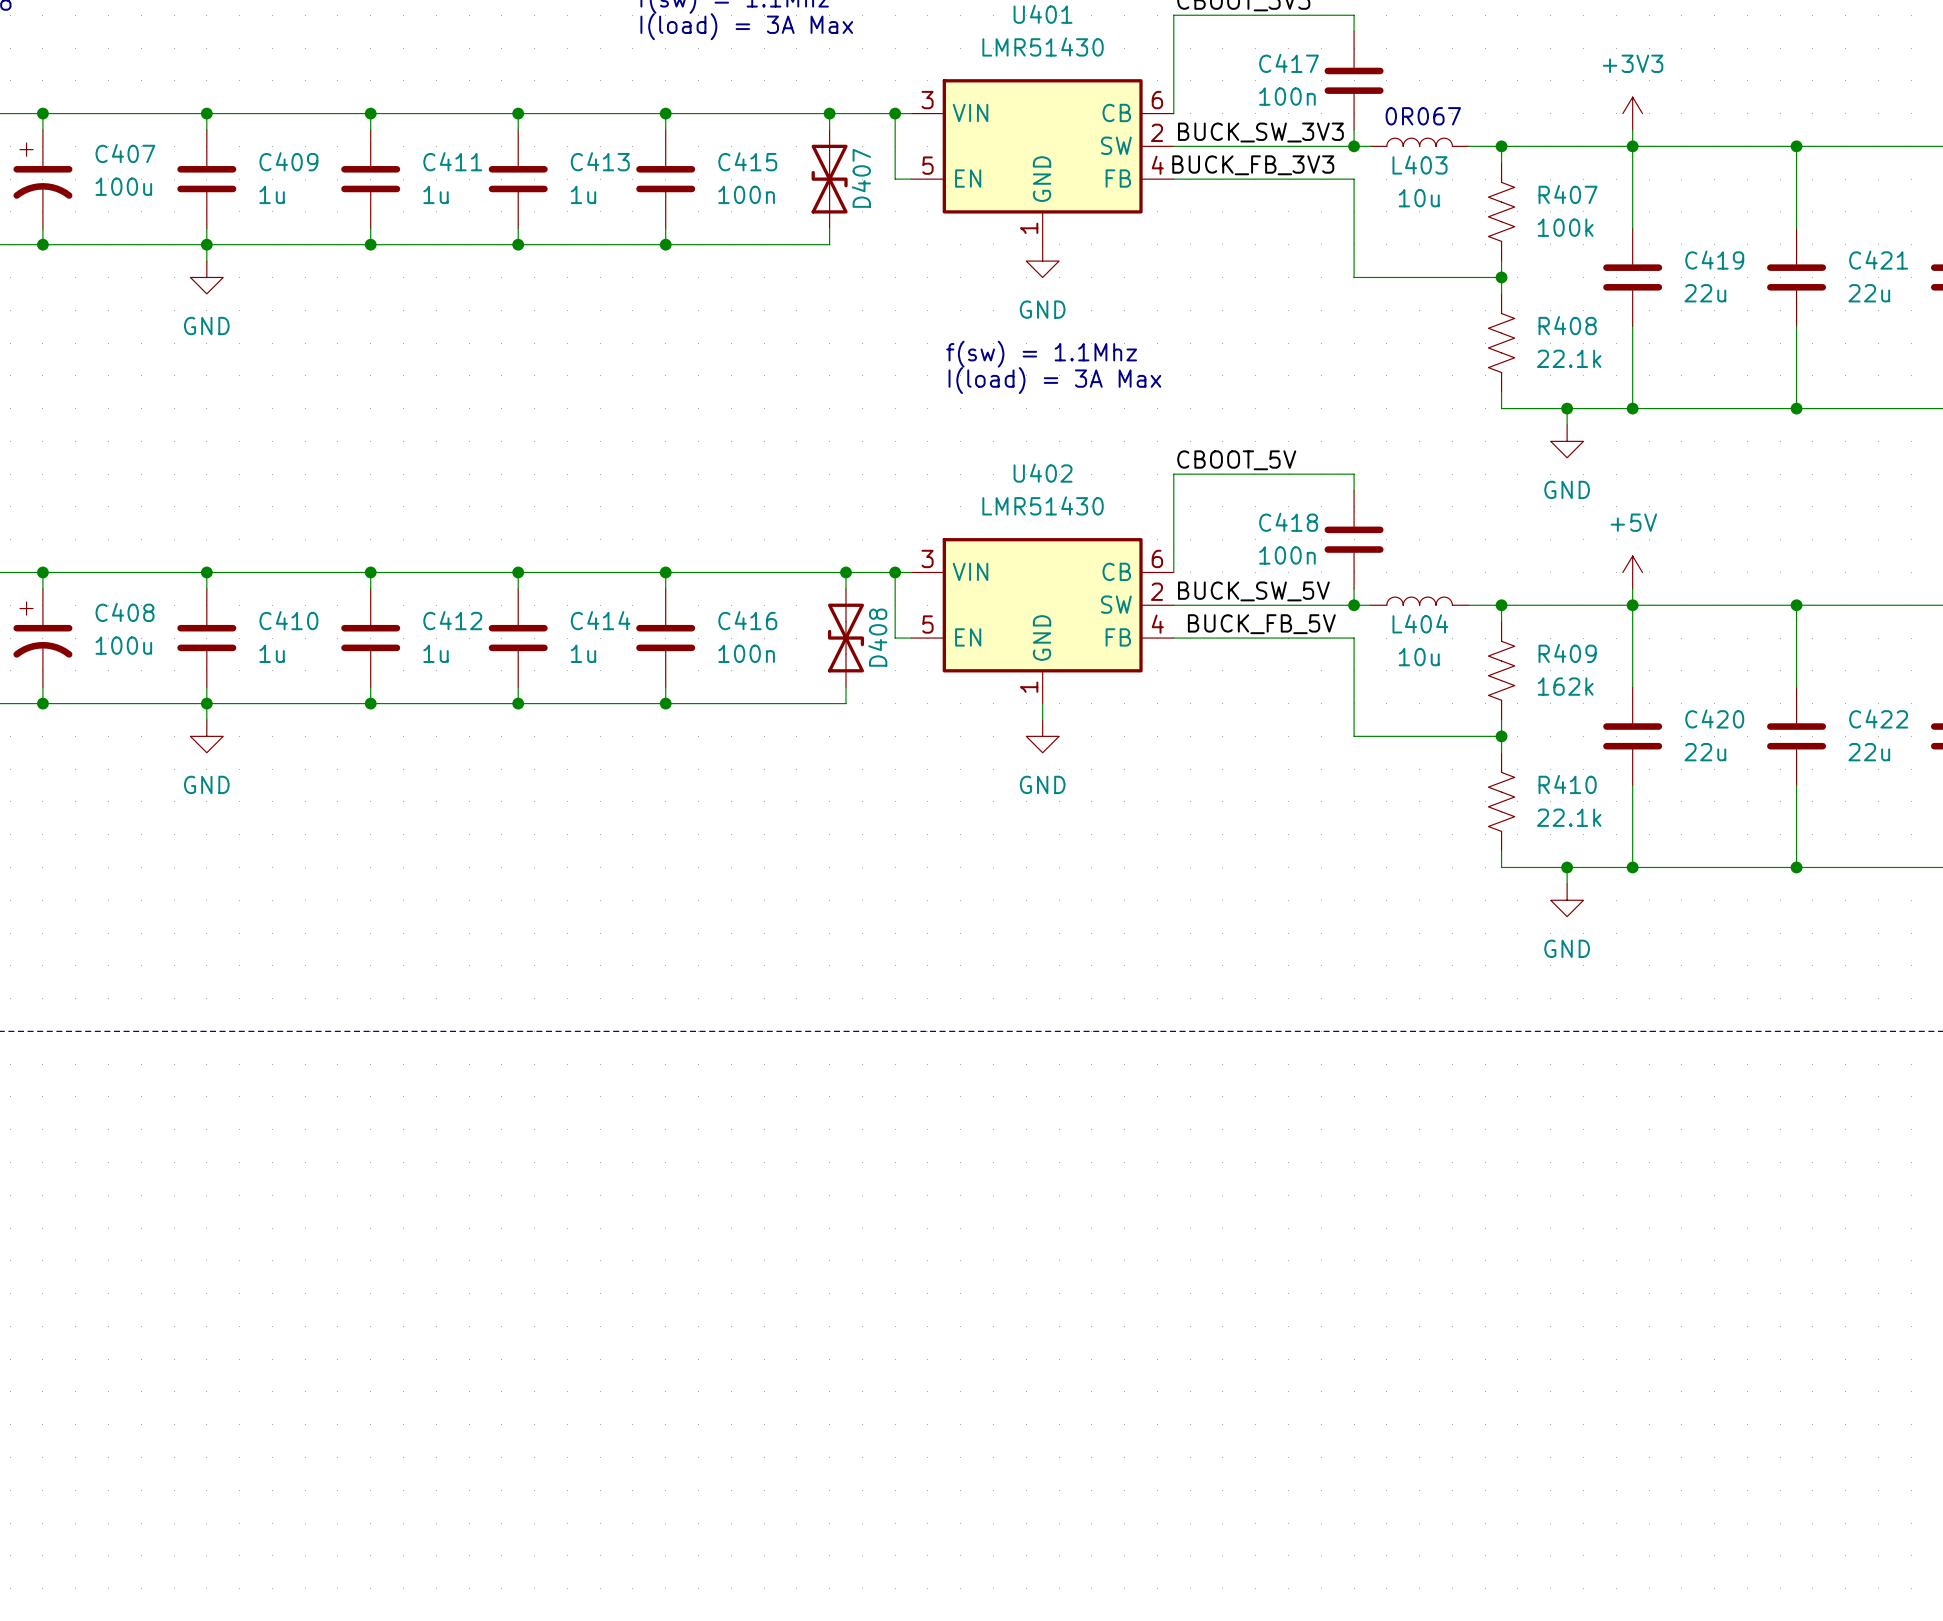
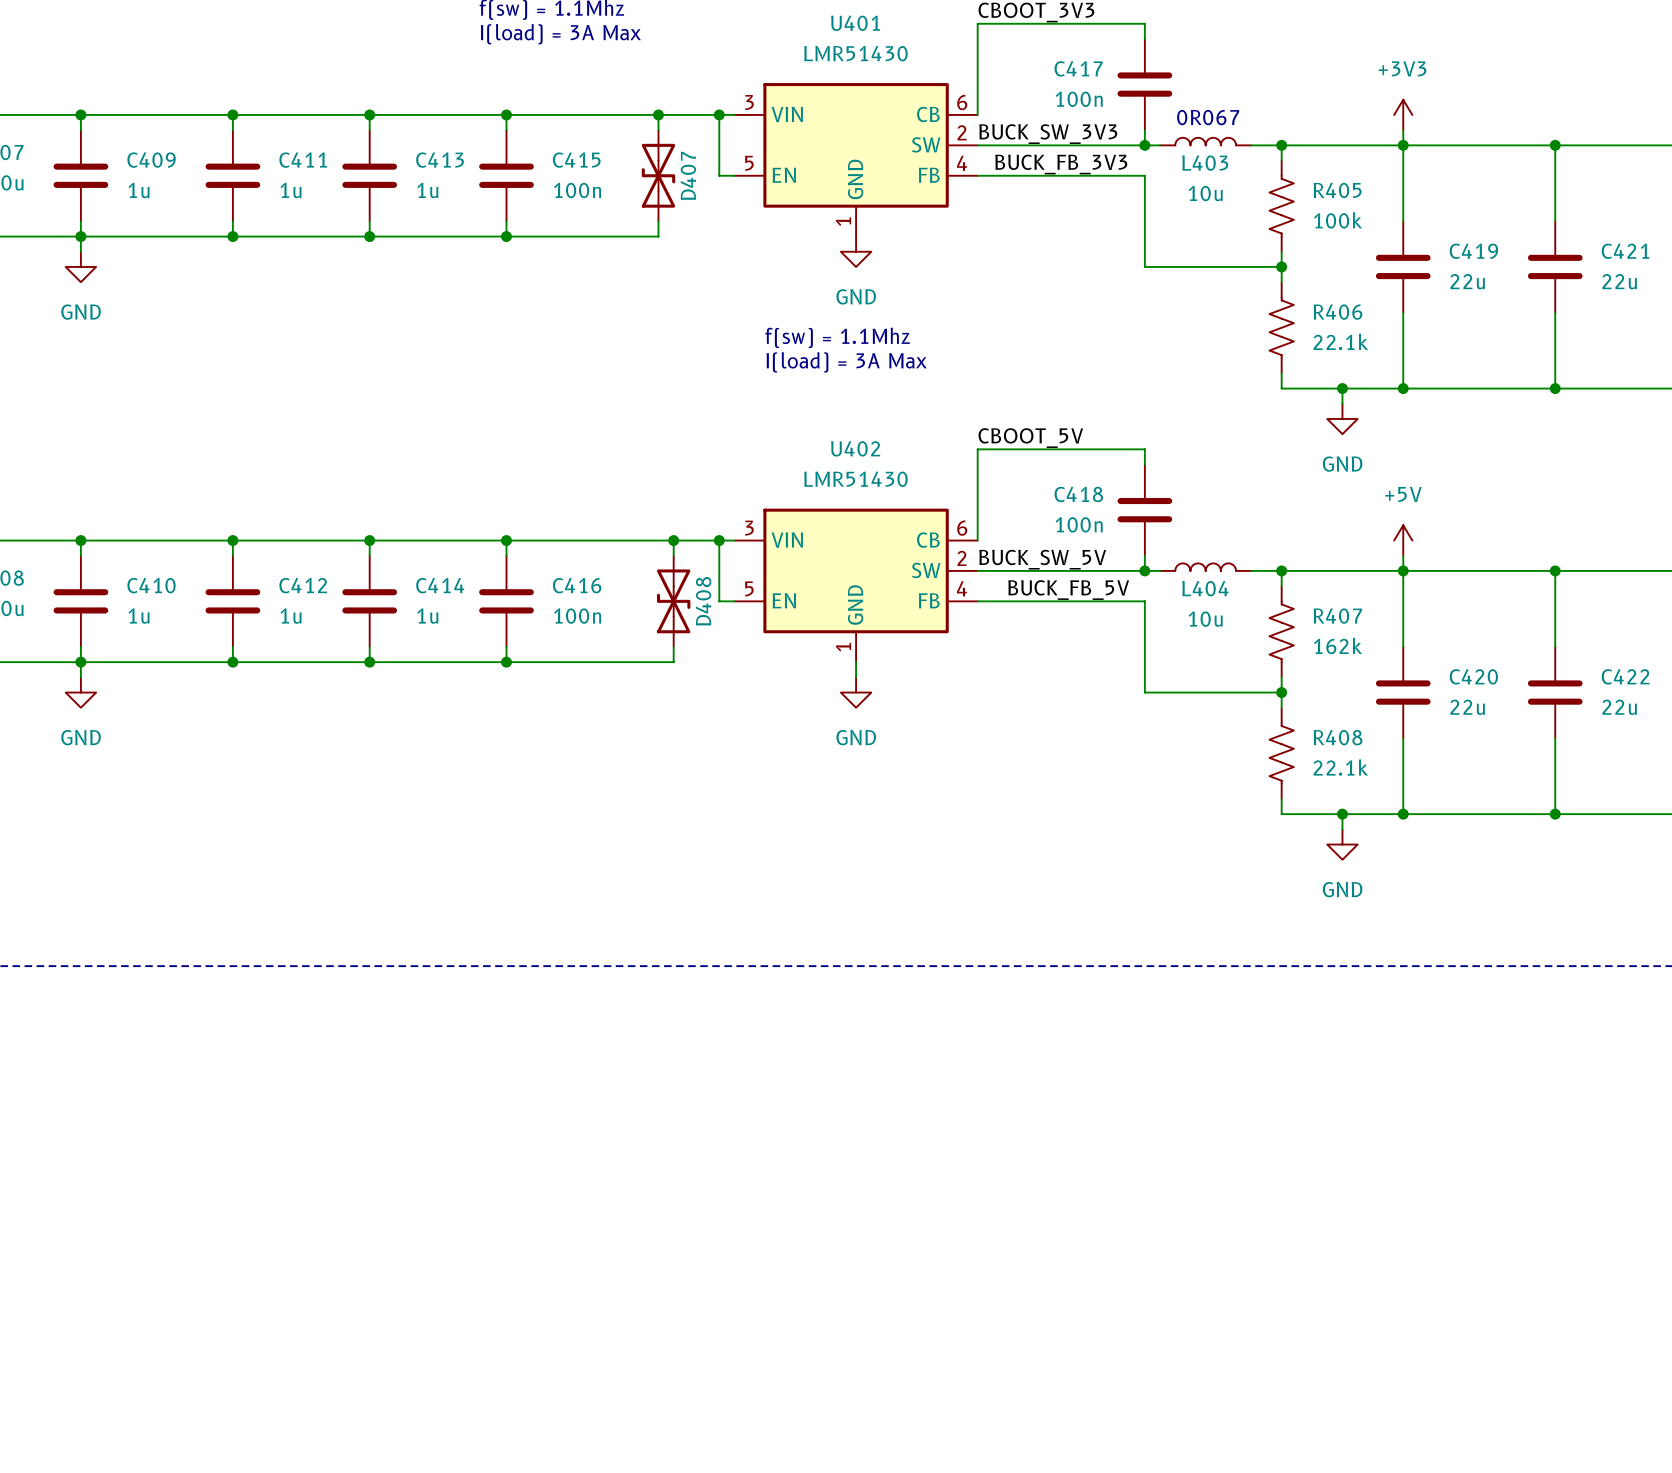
R407 name: R407 (1568, 194) -> R405 (1337, 190)
R408 name: R408 (1567, 325) -> R406 (1337, 312)
R409 name: R409 (1567, 653) -> R407 (1337, 616)
R410 name: R410 (1567, 784) -> R408 (1337, 737)

